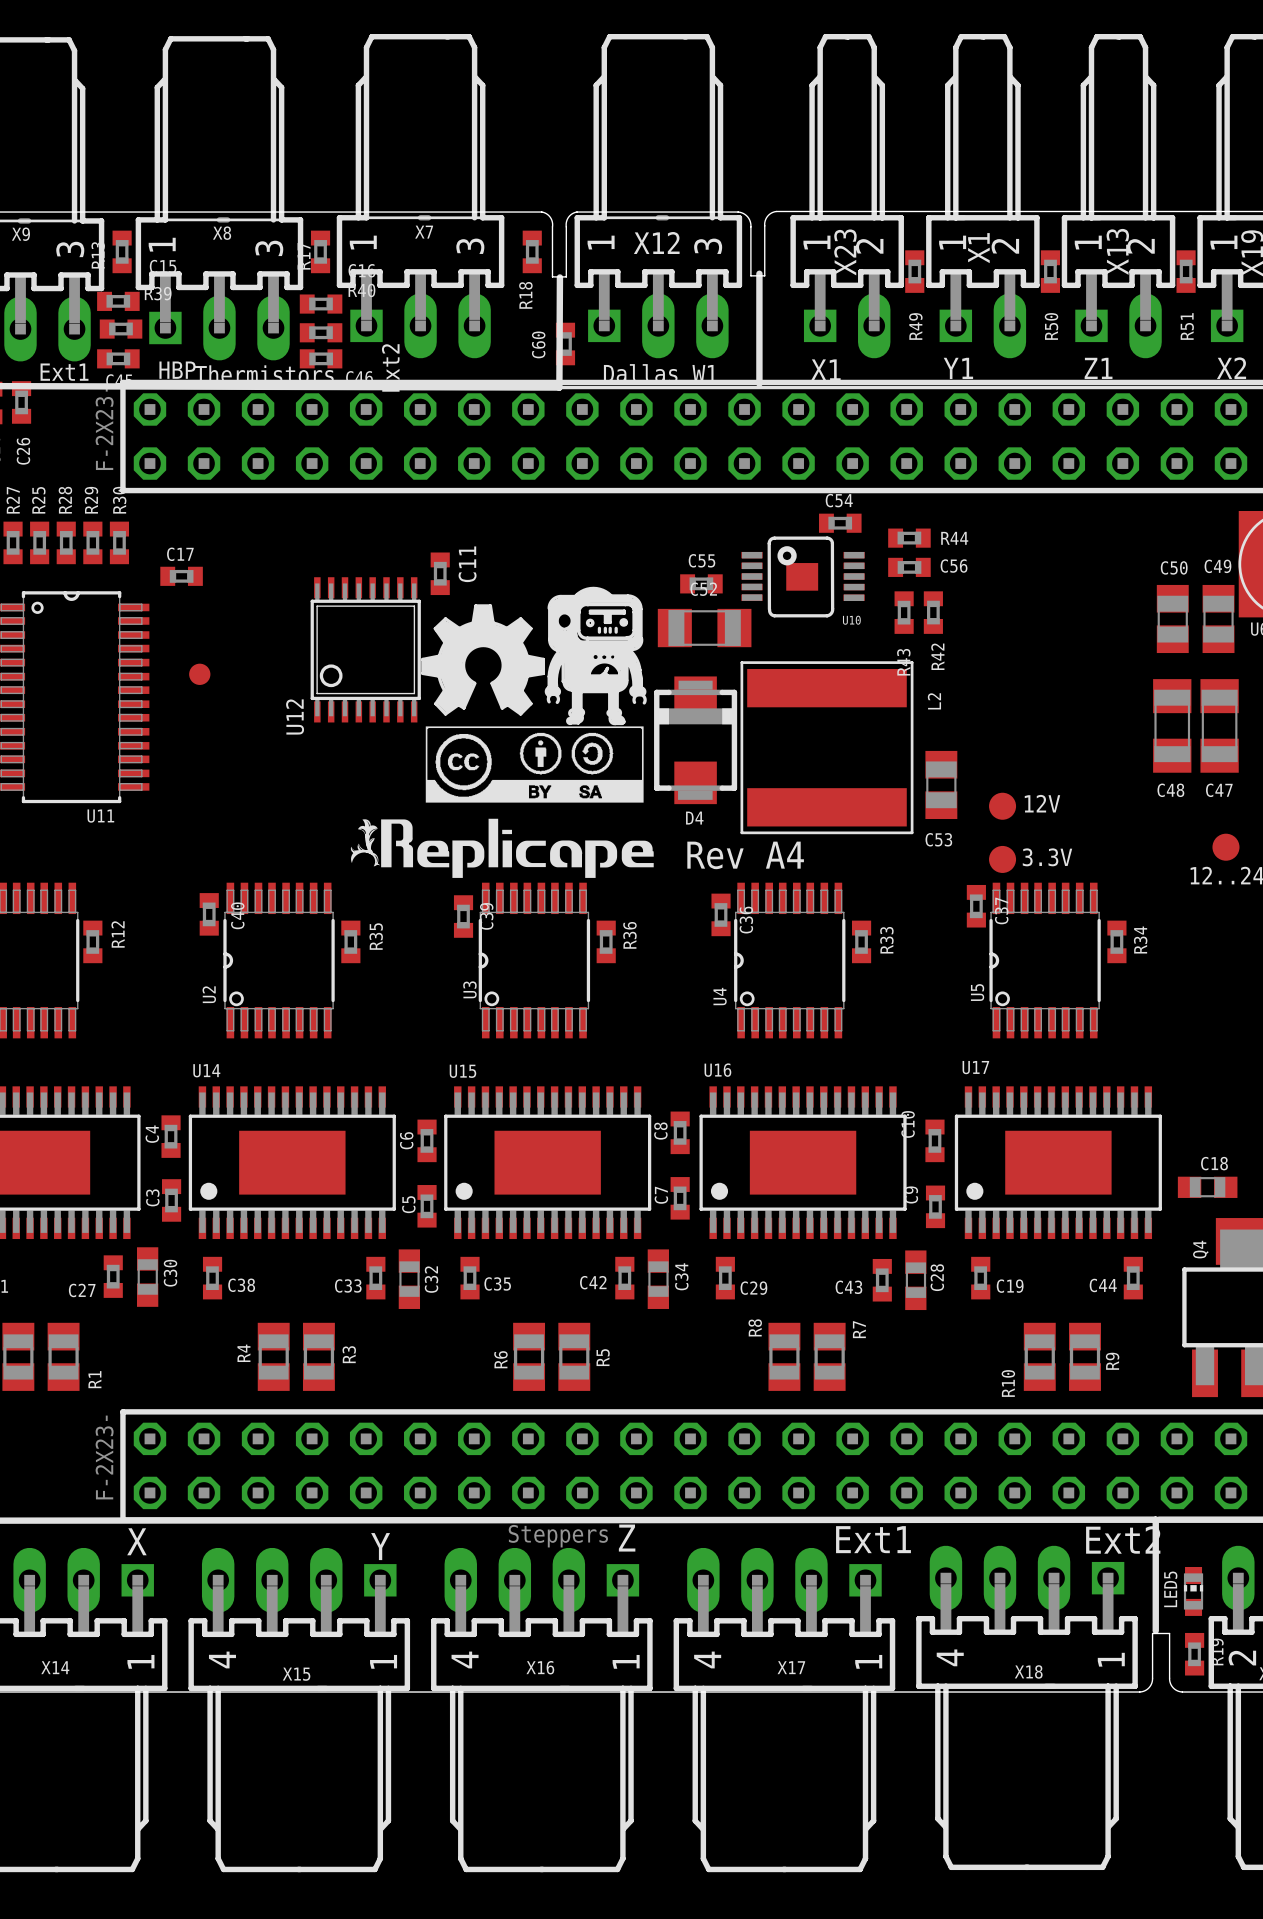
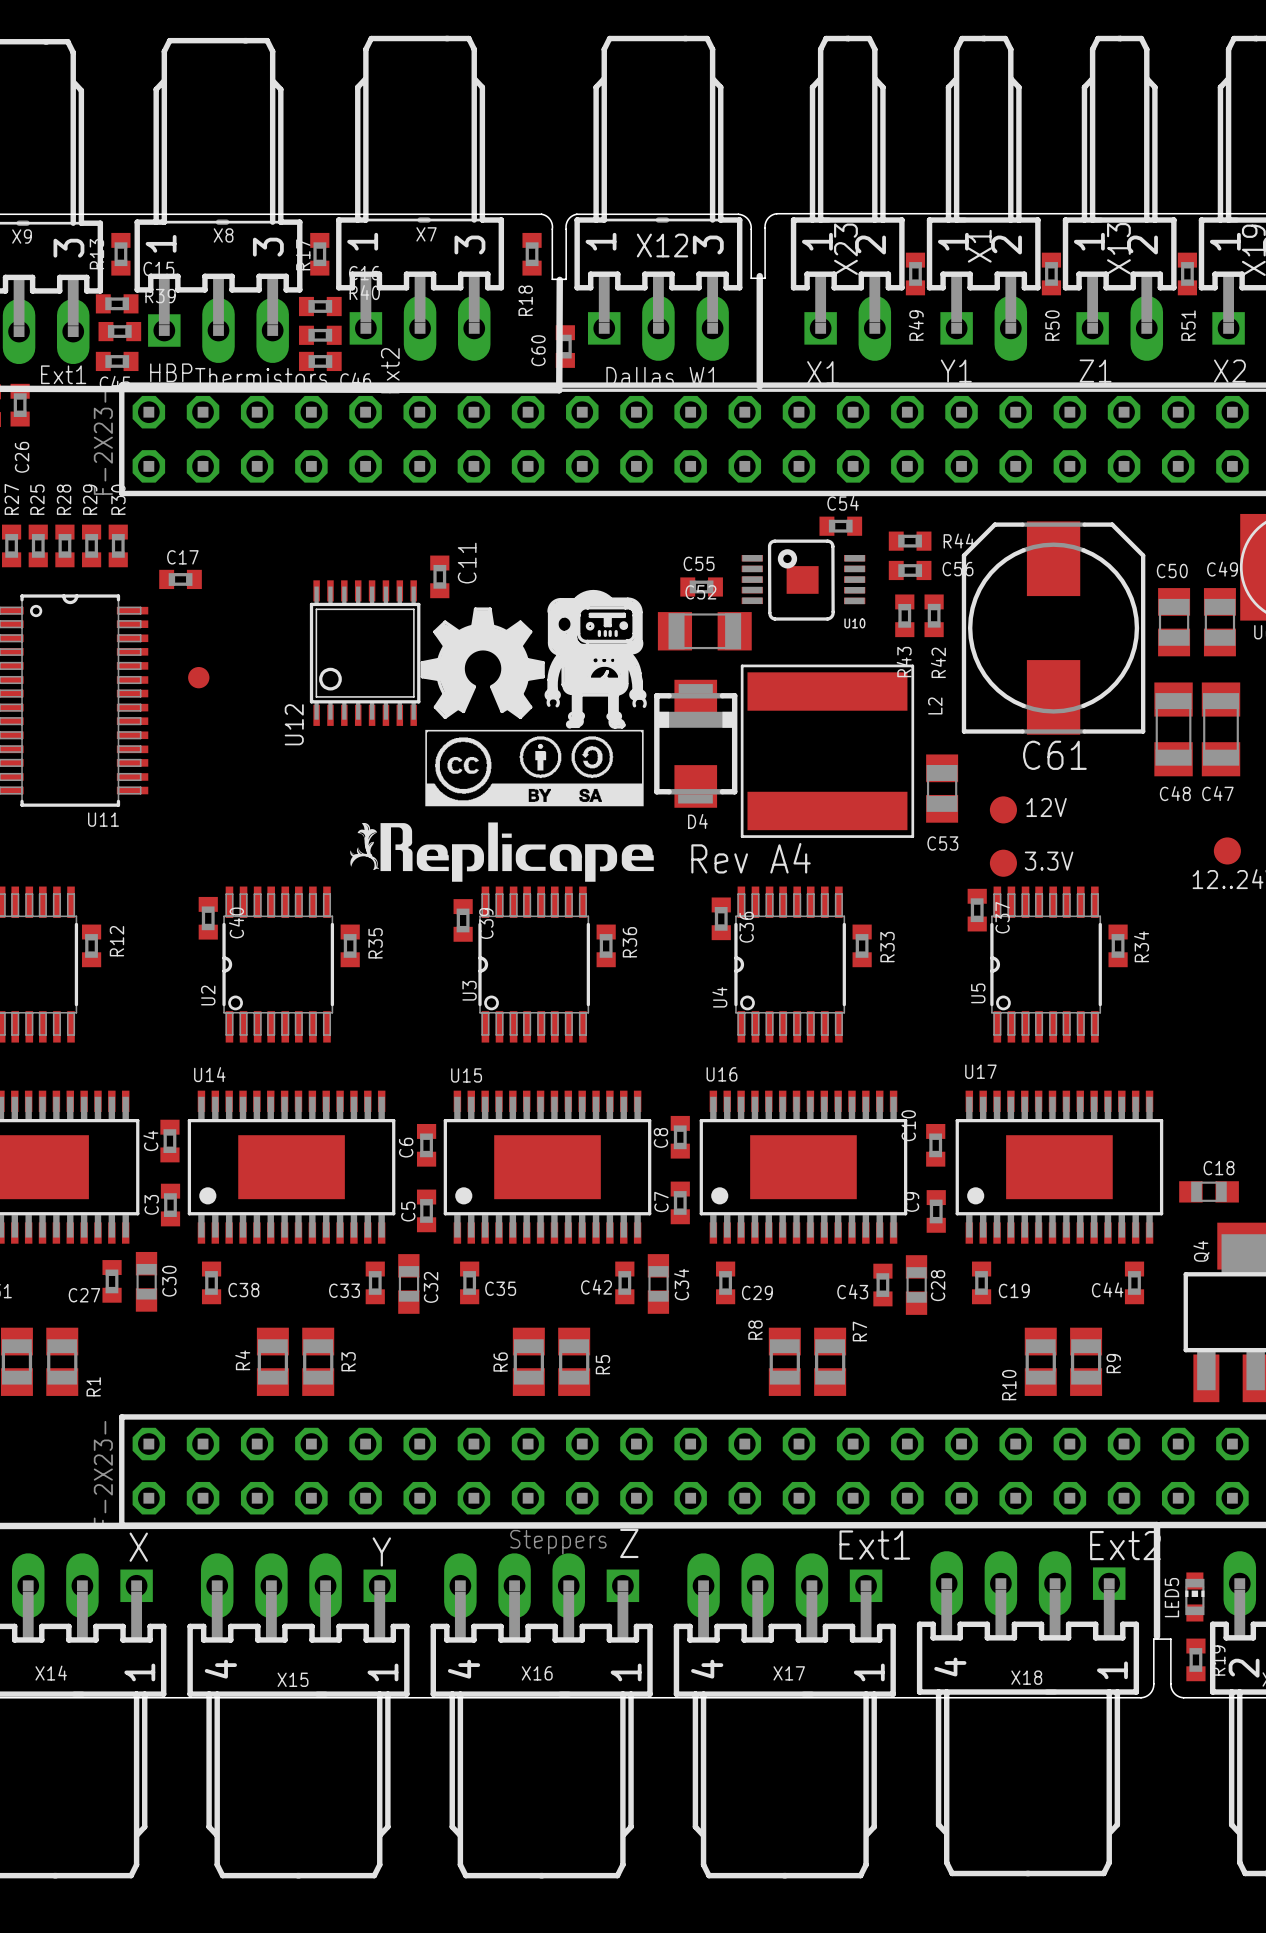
C61: none -> (1053, 628)

